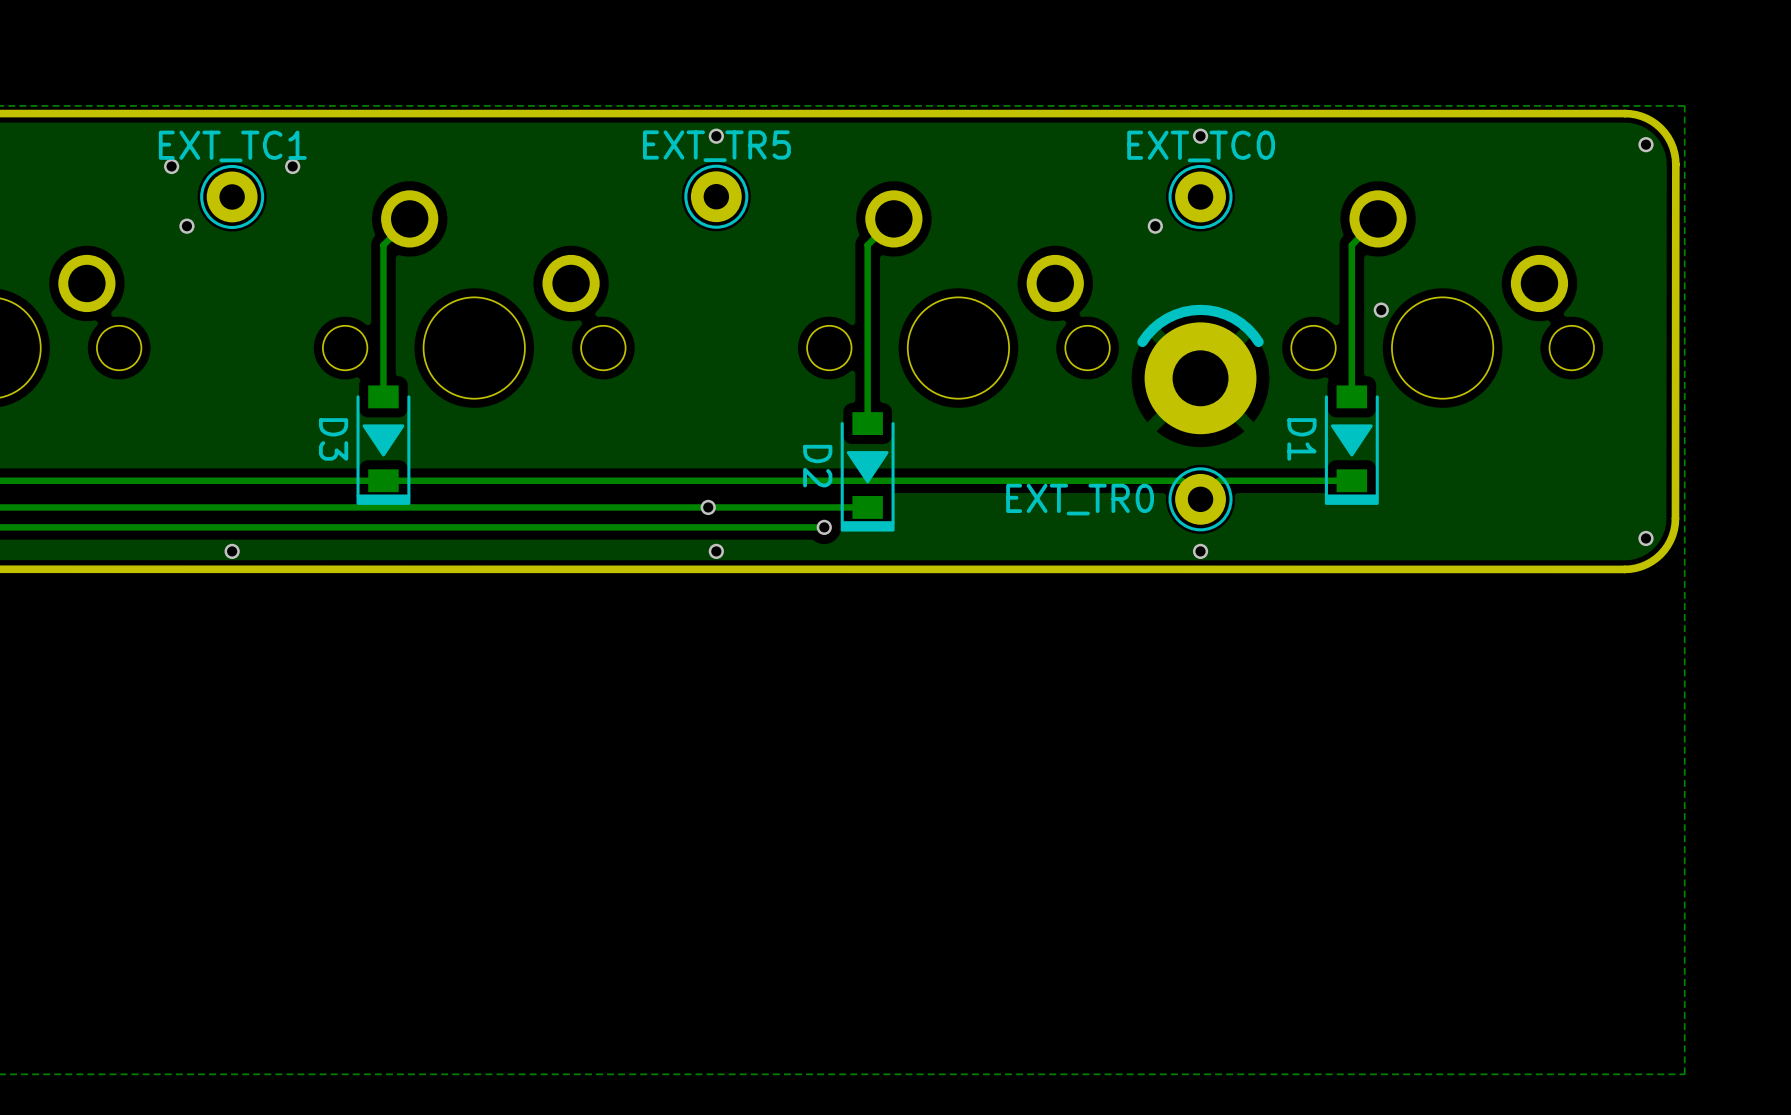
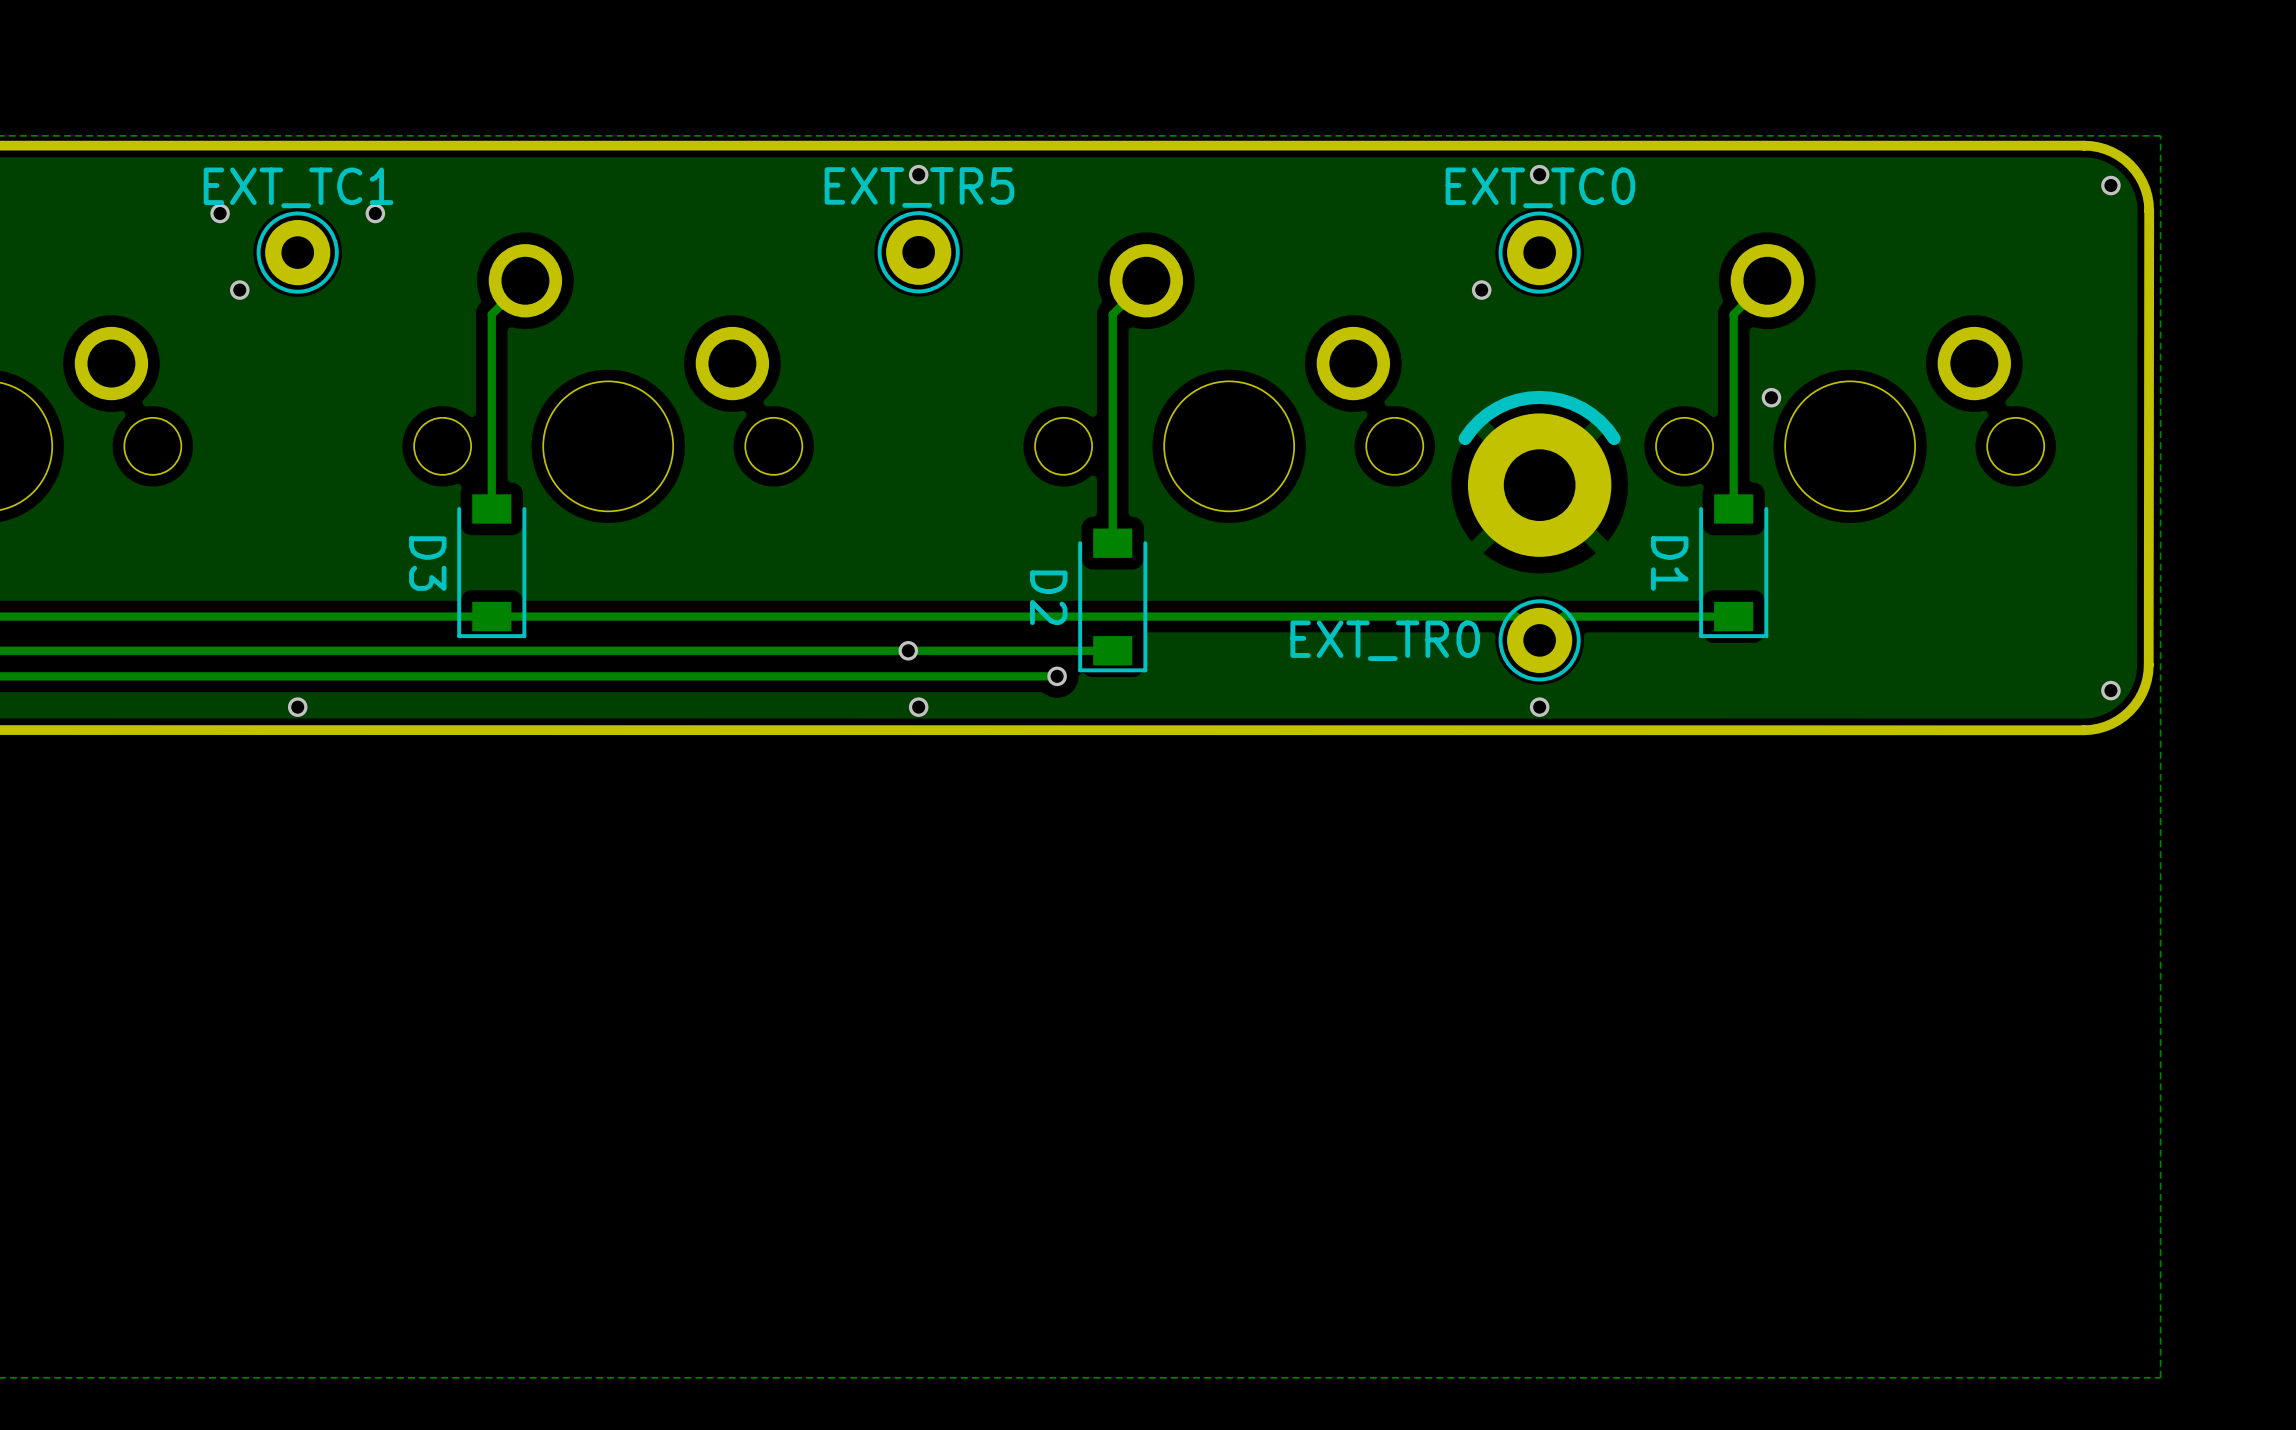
D3 footprint: [356, 385, 411, 505] -> [457, 494, 527, 639]
D1 footprint: [1324, 385, 1379, 505] -> [1699, 494, 1769, 639]
D2 footprint: [840, 412, 895, 532] -> [1078, 528, 1148, 673]

